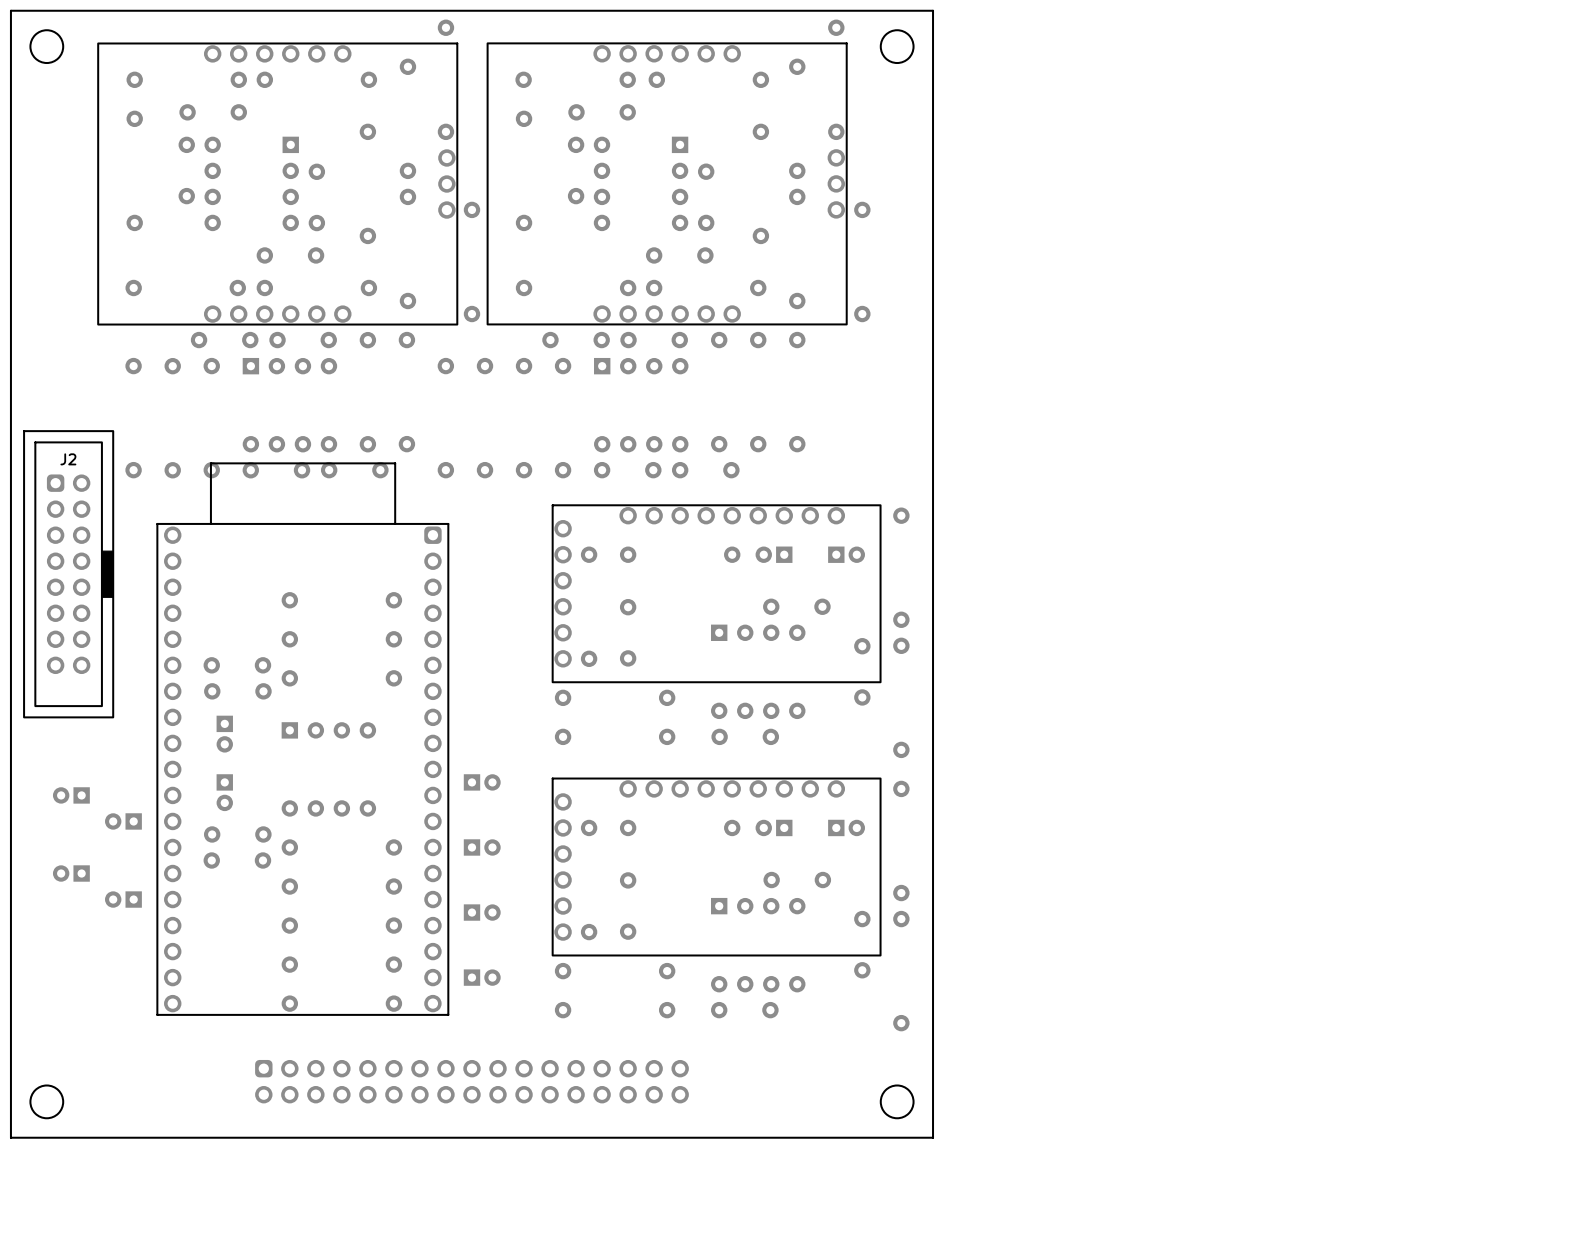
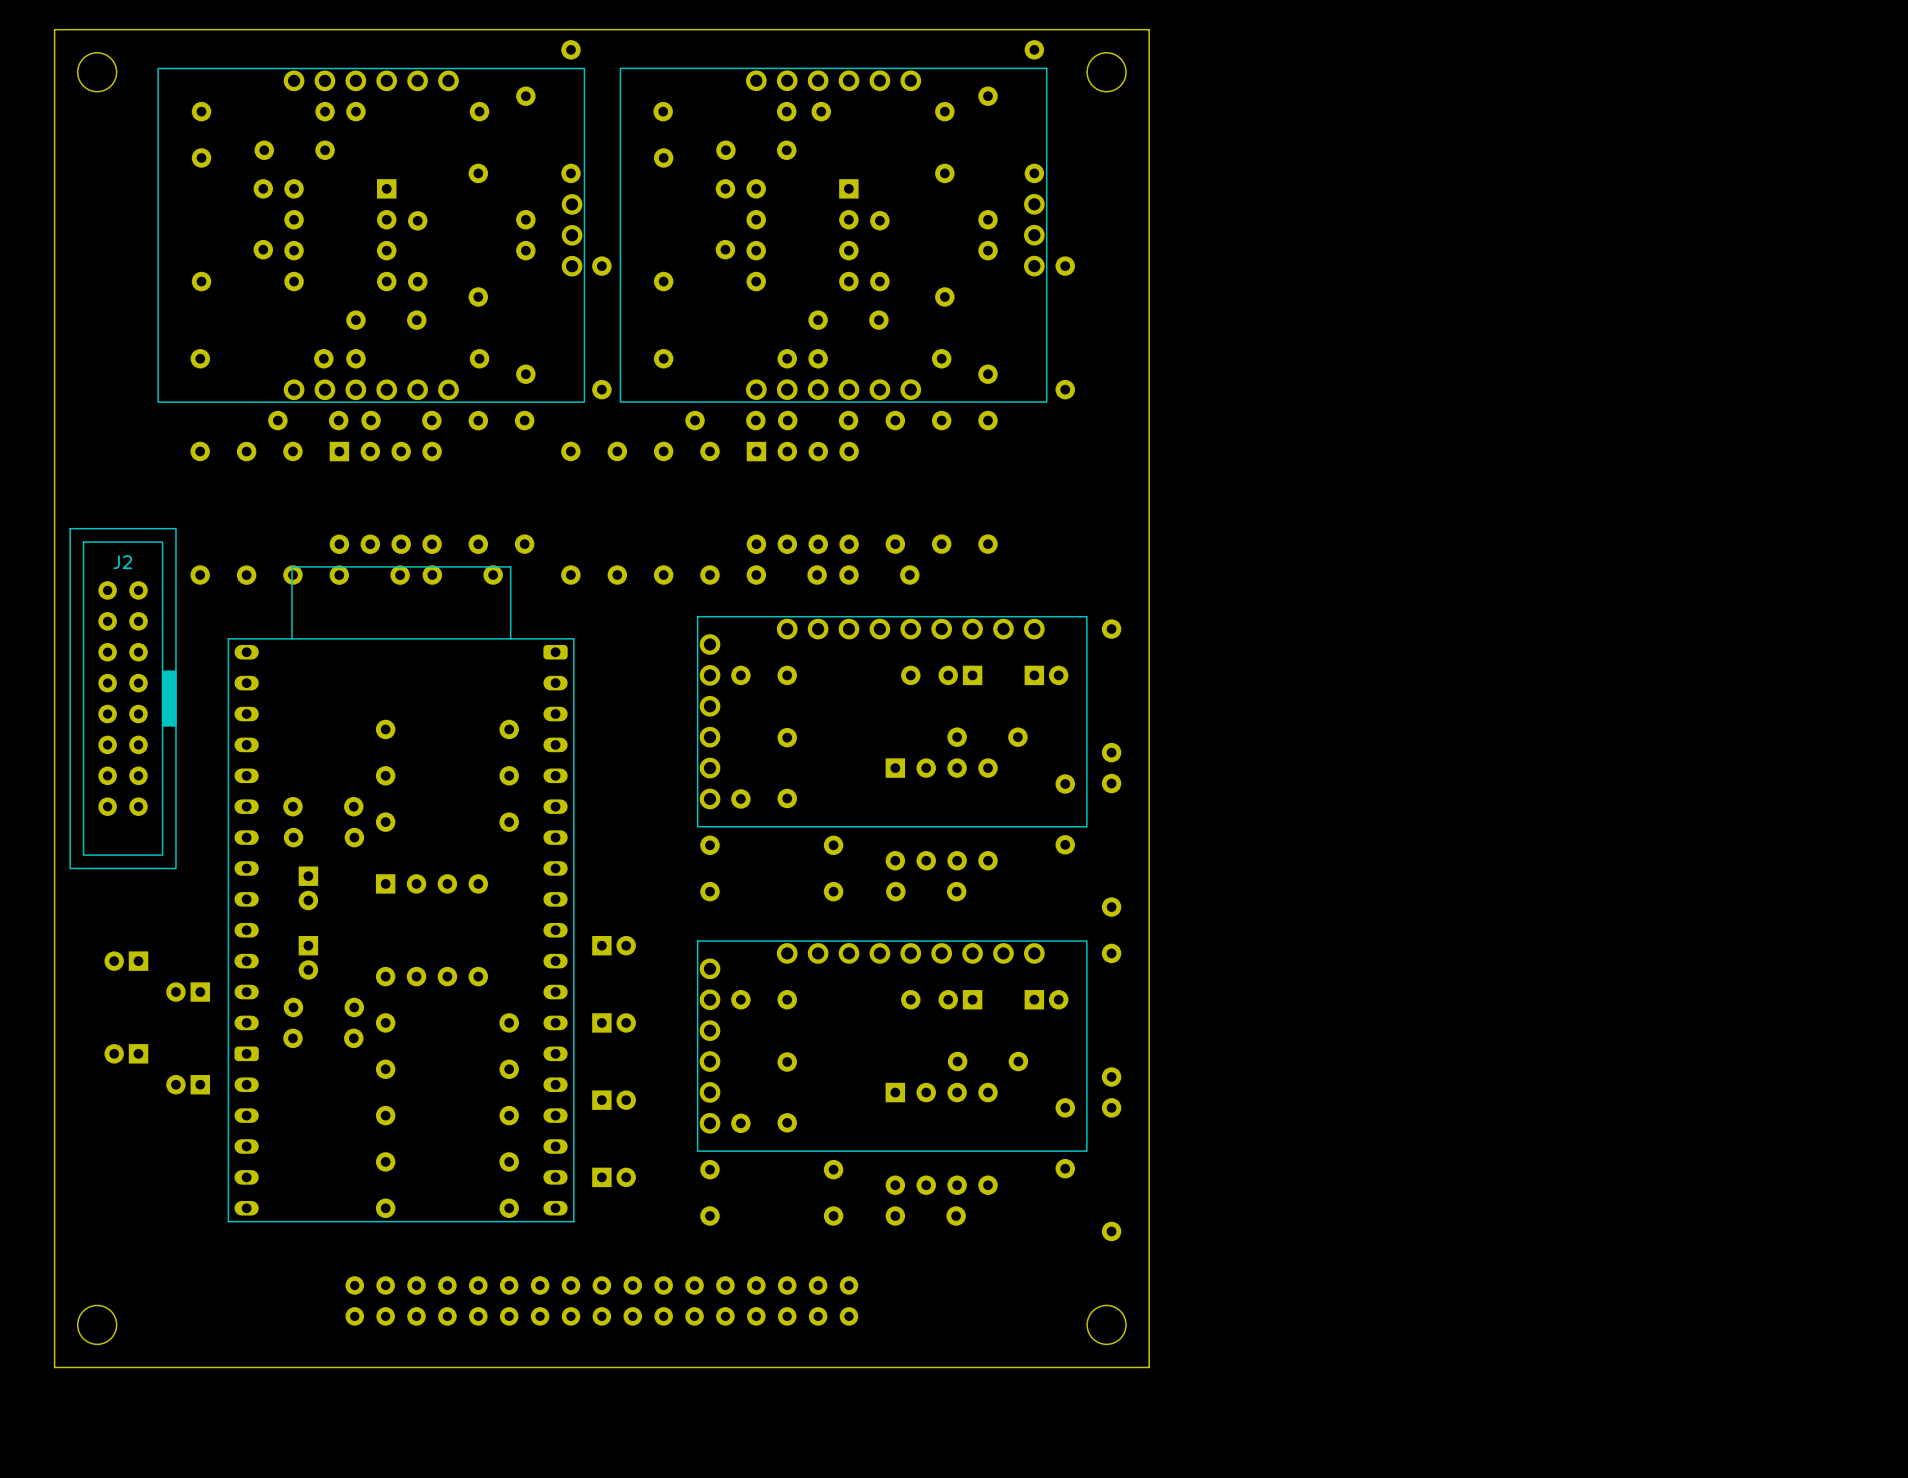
J2 footprint: [23, 430, 114, 718] -> [69, 527, 177, 870]
part footprint: [156, 462, 449, 1016] -> [227, 566, 575, 1223]
part footprint: [255, 1059, 689, 1104] -> [345, 1276, 859, 1326]

